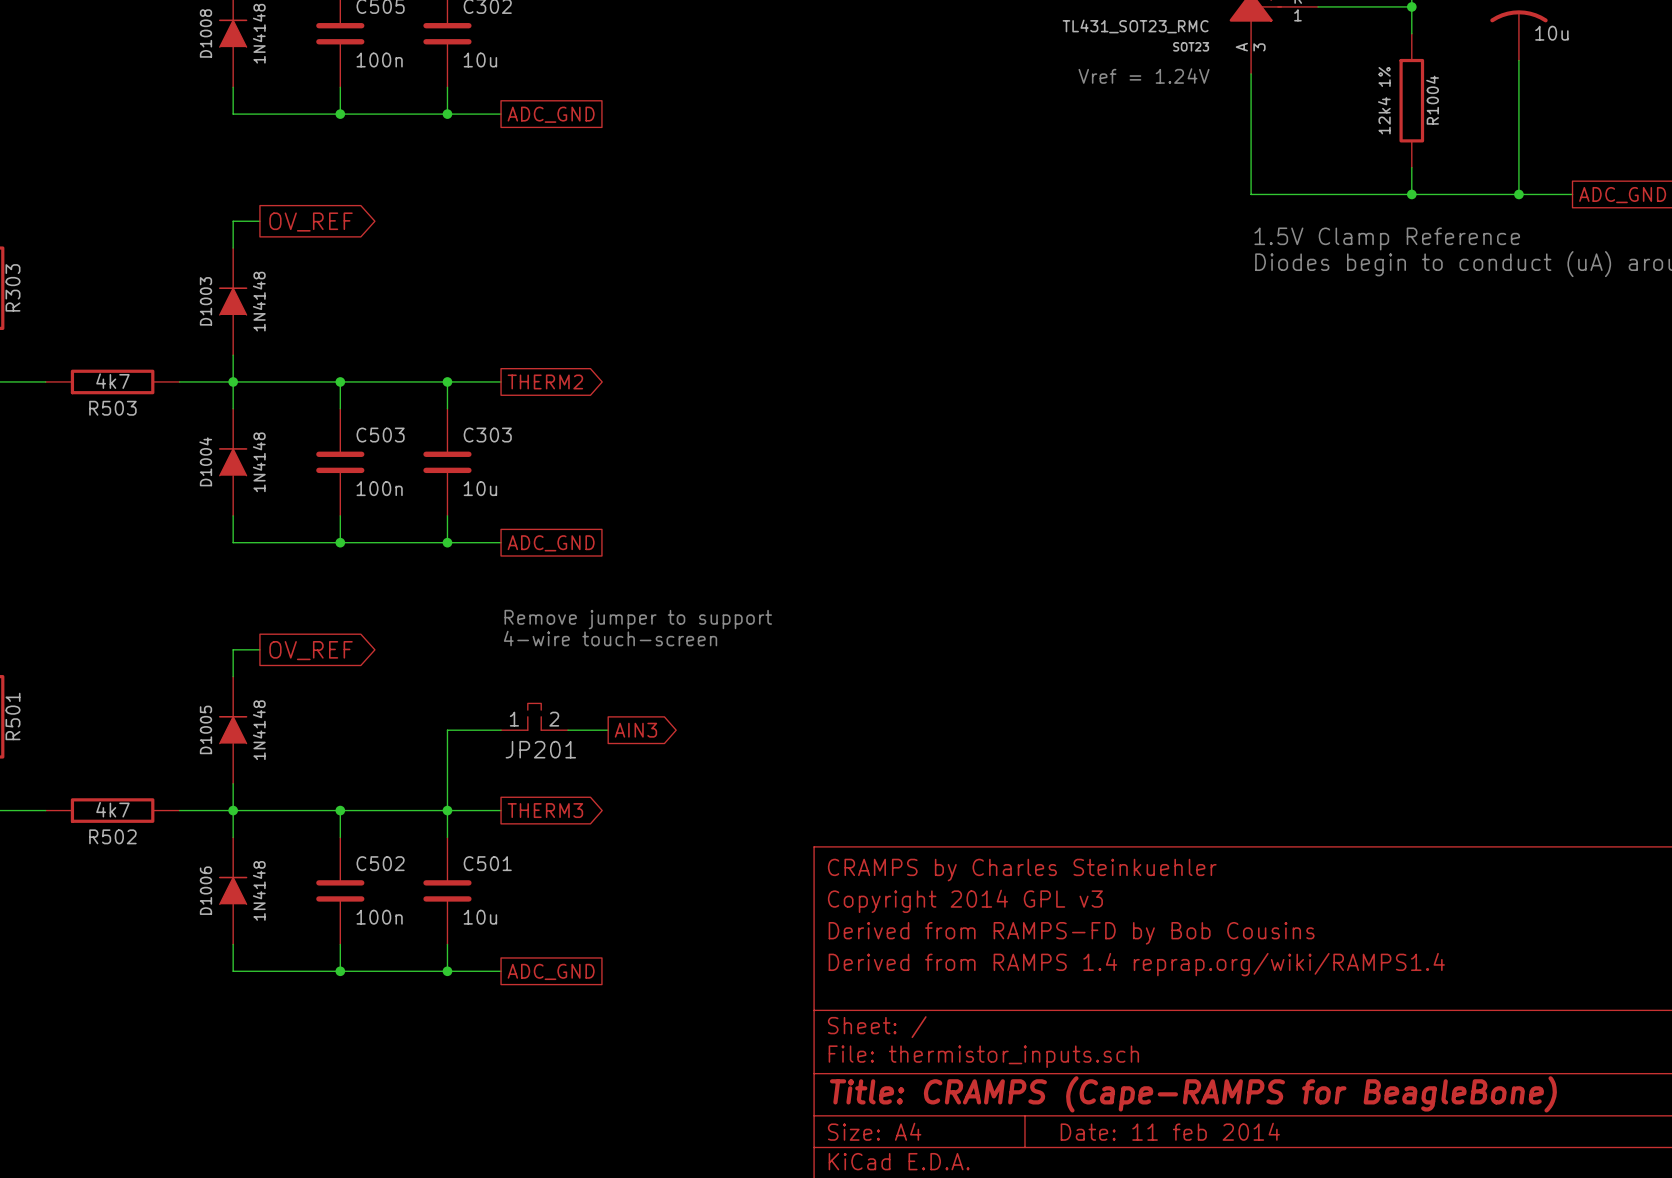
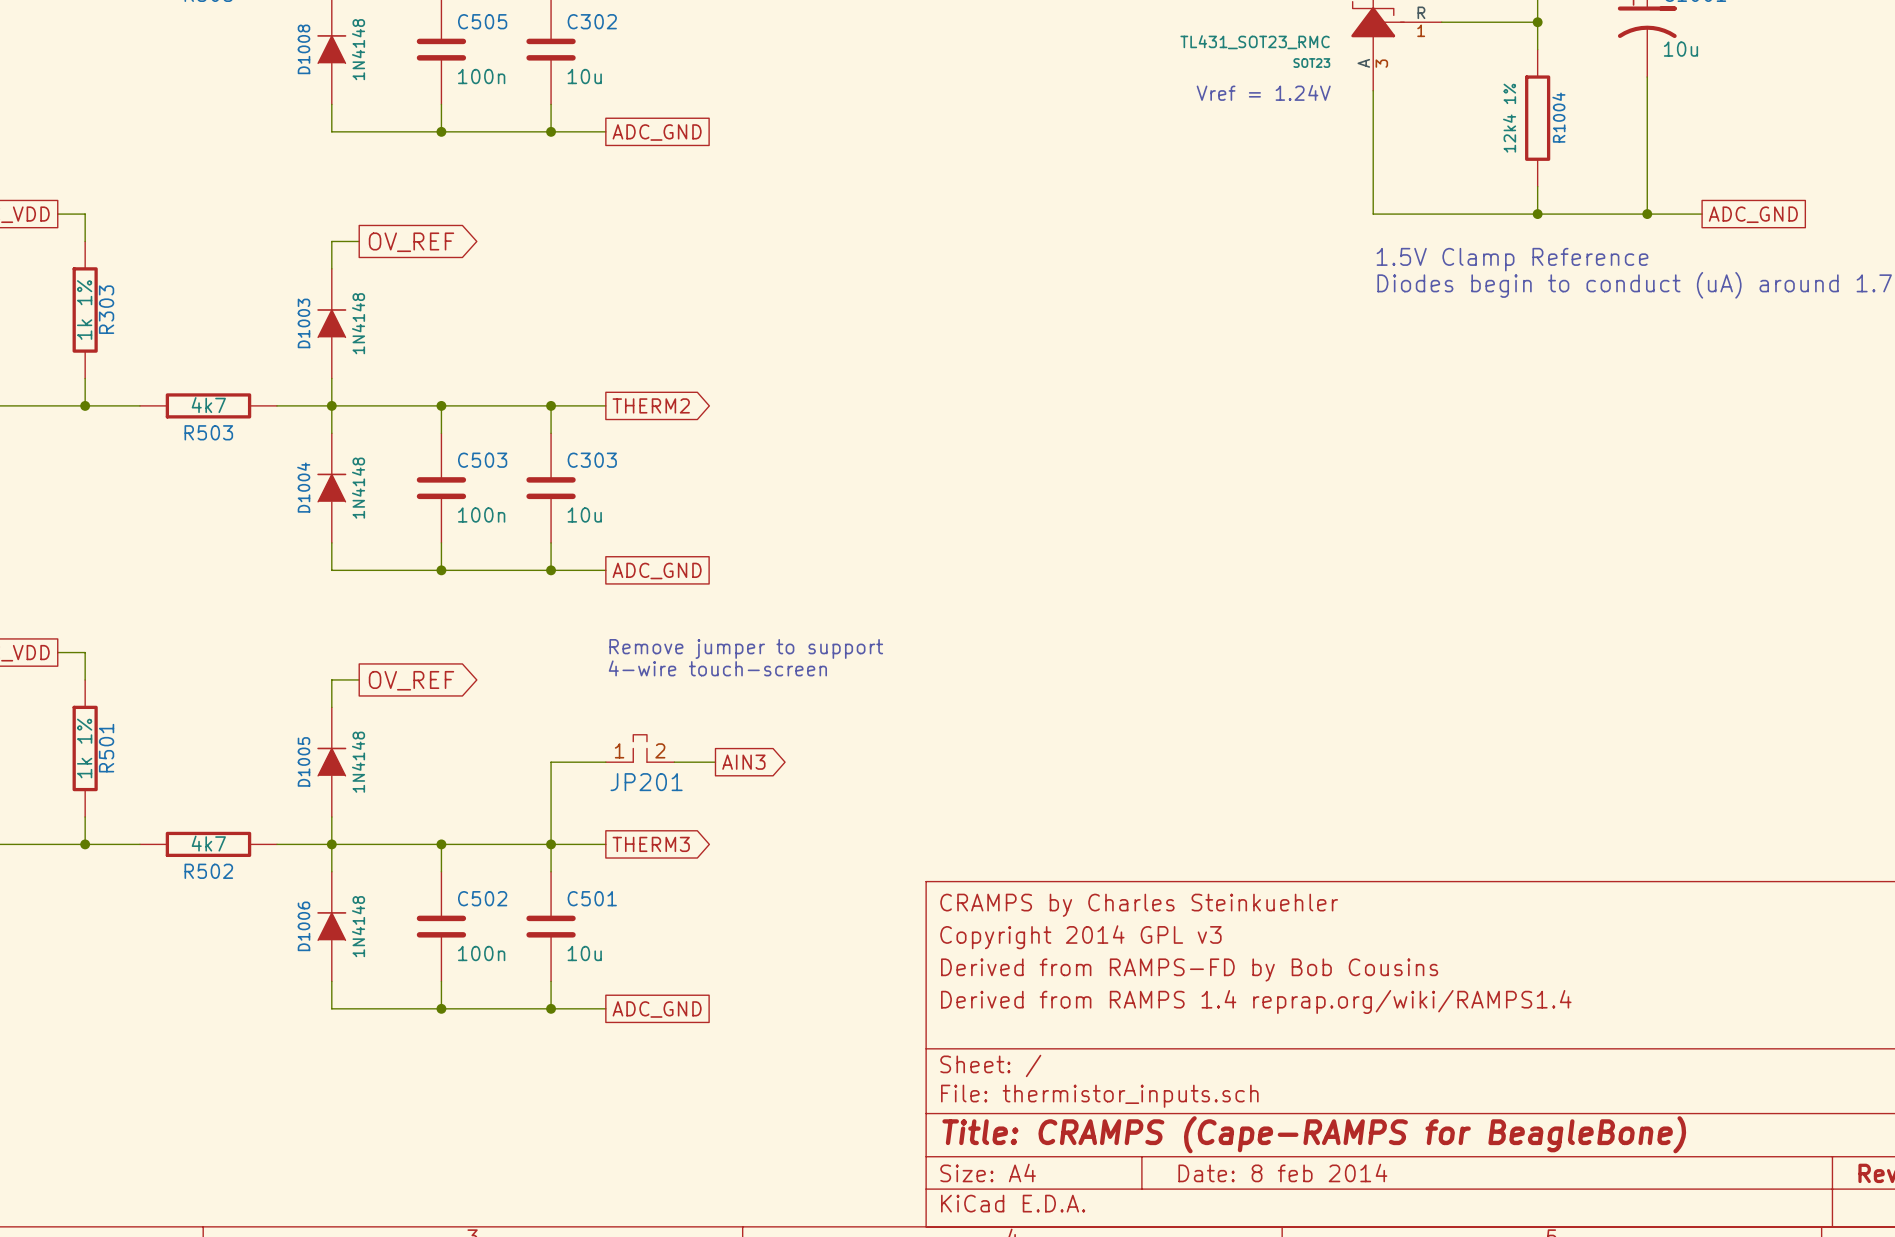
title block: Date: 11 feb 2014 (1170, 1131) -> Date: 8 feb 2014 (1282, 1173)

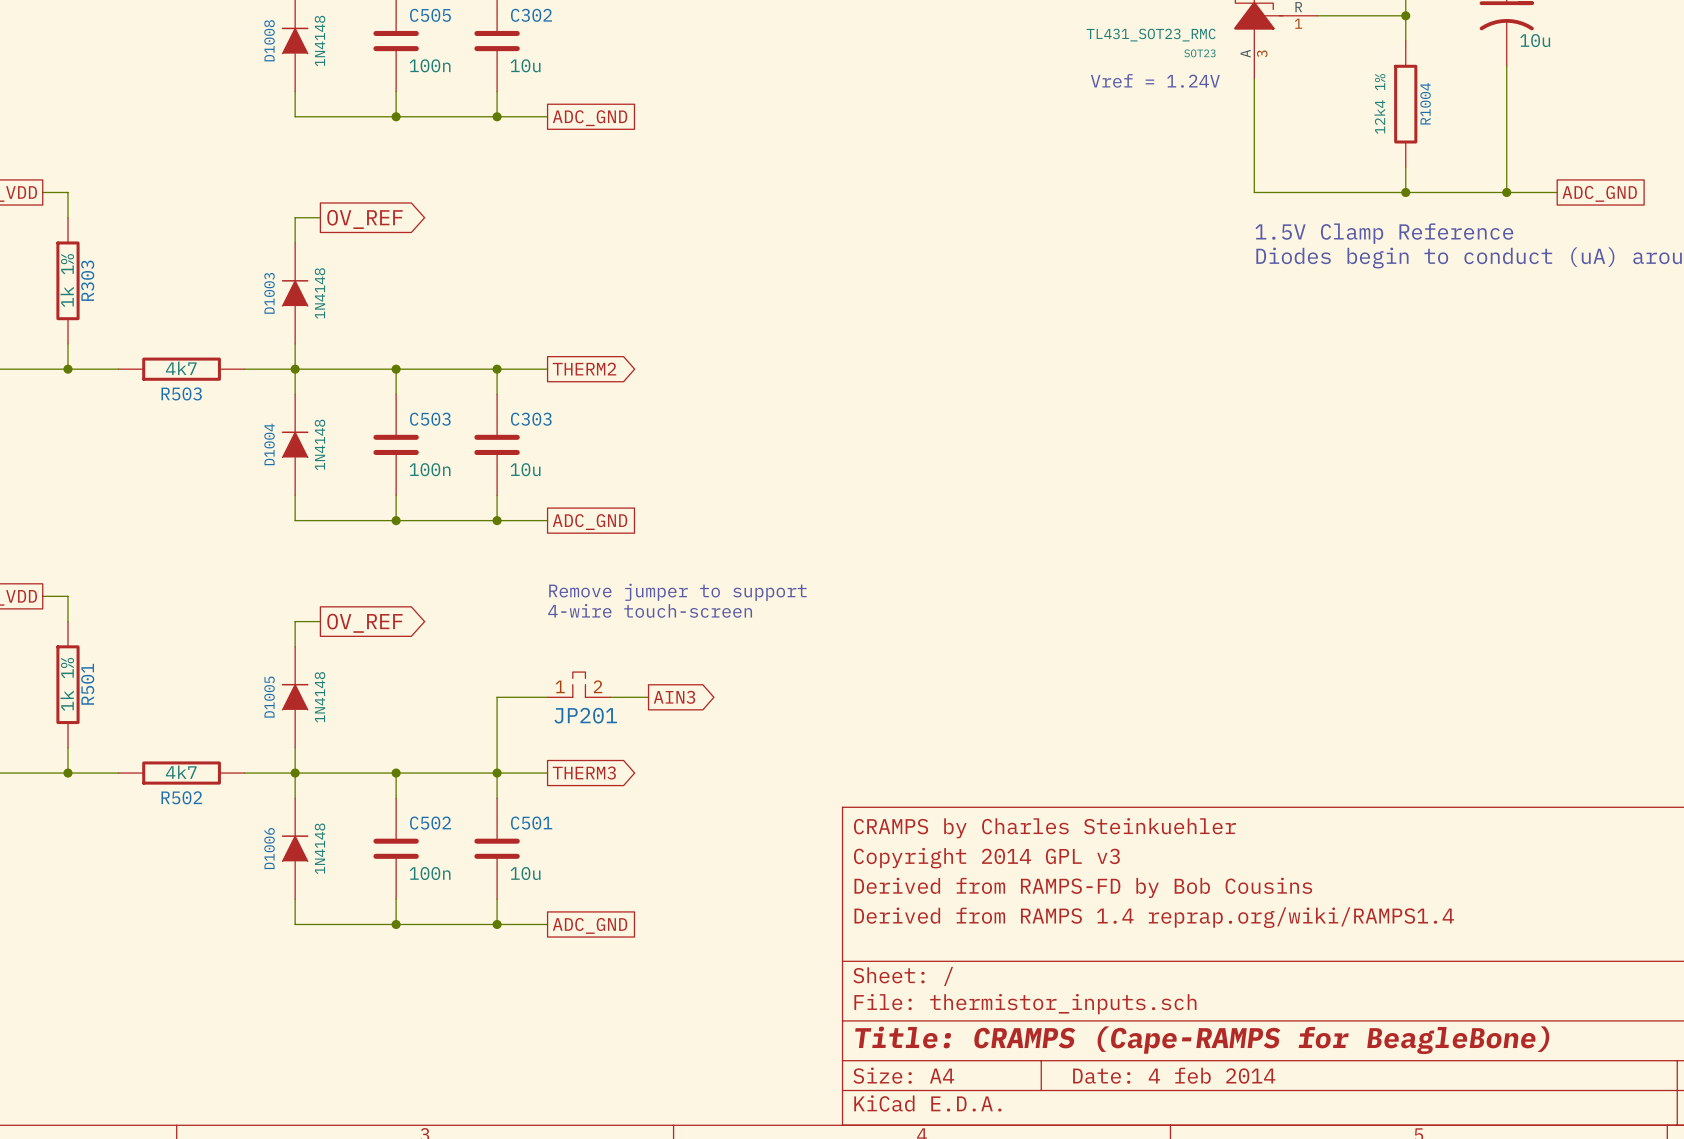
title block: Date: 8 feb 2014 (1282, 1173) -> Date: 4 feb 2014 (1174, 1075)

